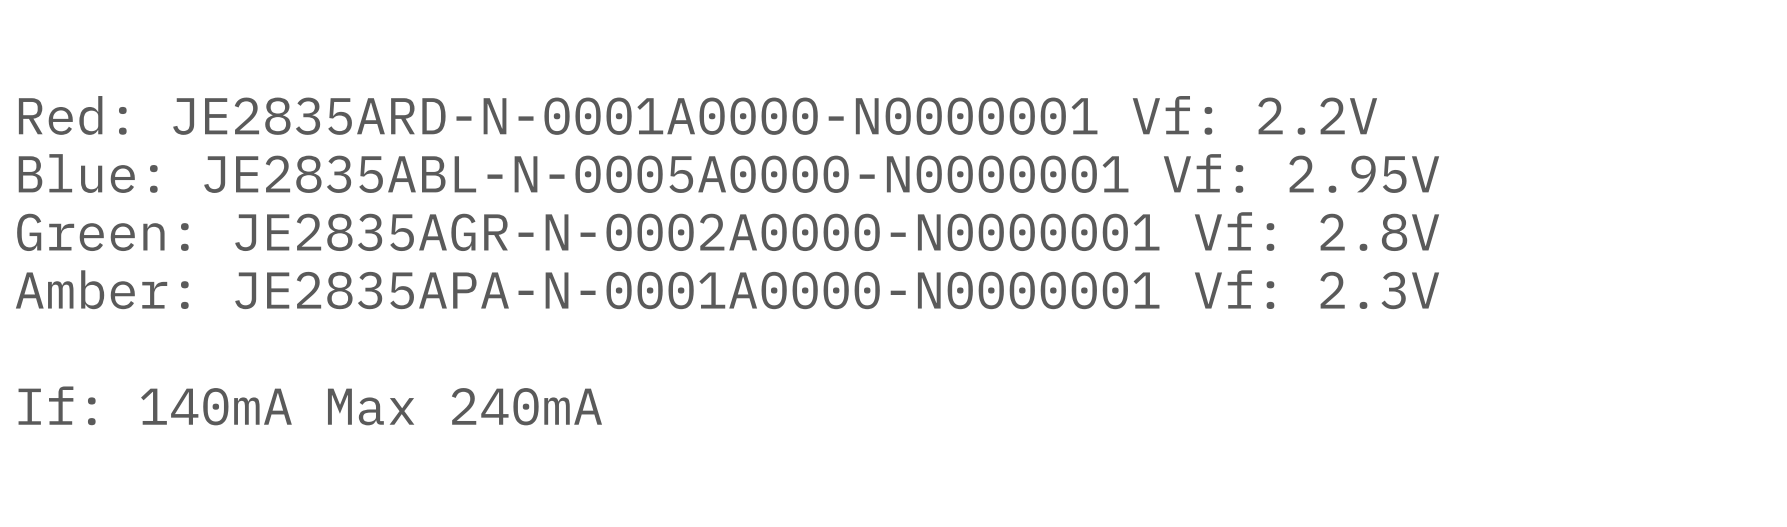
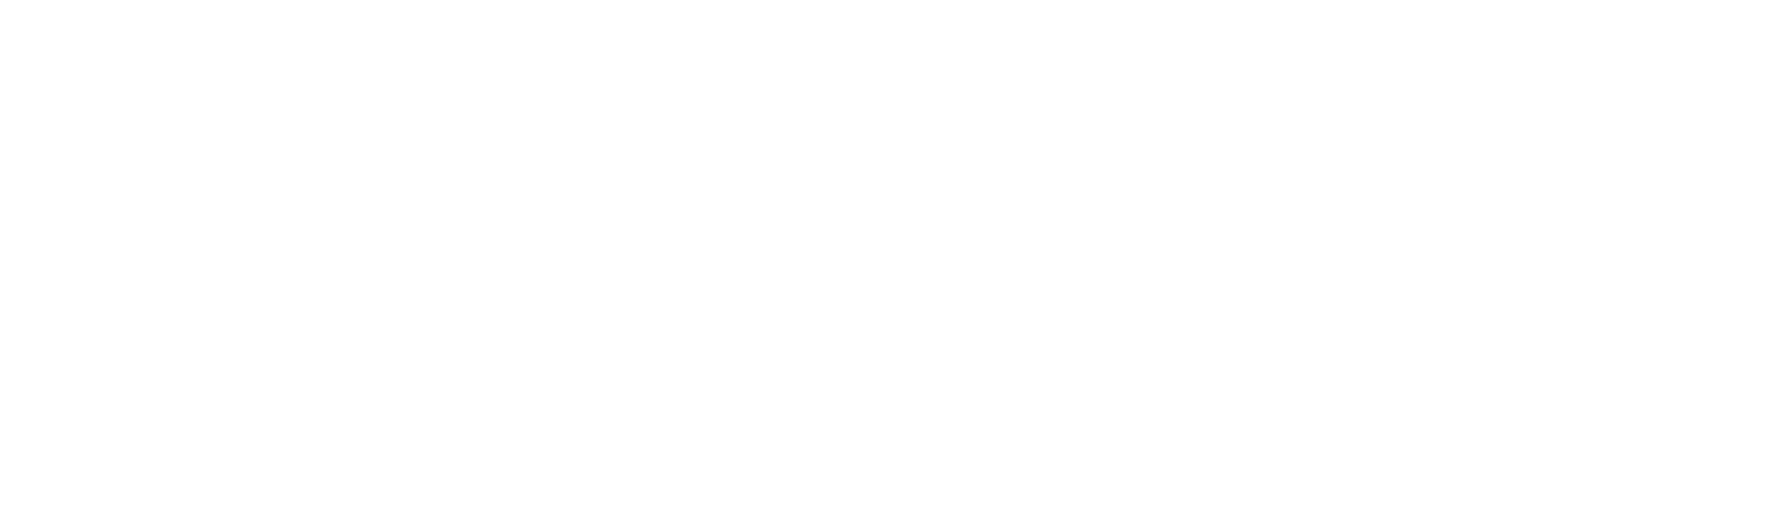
text: Red: JE2835ARD-N-0001A0000-N0000001 Vf: 2.2V (698, 115) -> none
text: Blue: JE2835ABL-N-0005A0000-N0000001 Vf: 2.95V (728, 173) -> none
text: Green: JE2835AGR-N-0002A0000-N0000001 Vf: 2.8V (728, 231) -> none
text: Amber: JE2835APA-N-0001A0000-N0000001 Vf: 2.3V (727, 289) -> none
text: If: 140mA Max 240mA (310, 405) -> none

